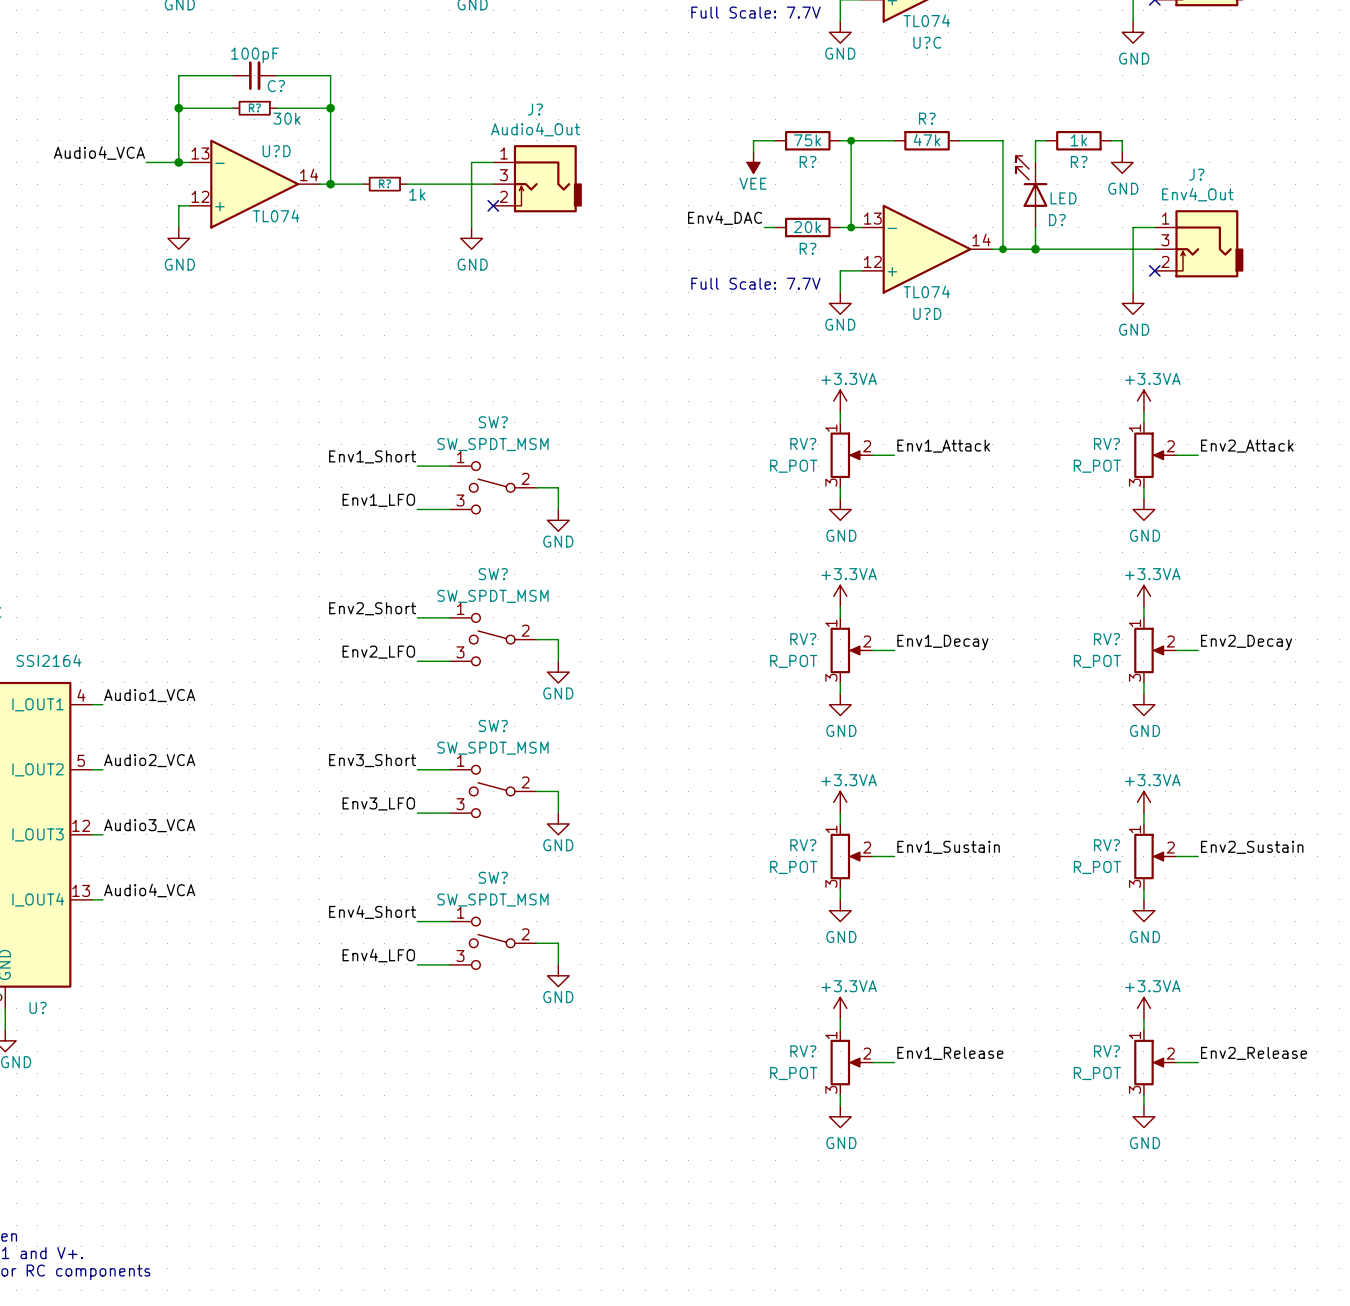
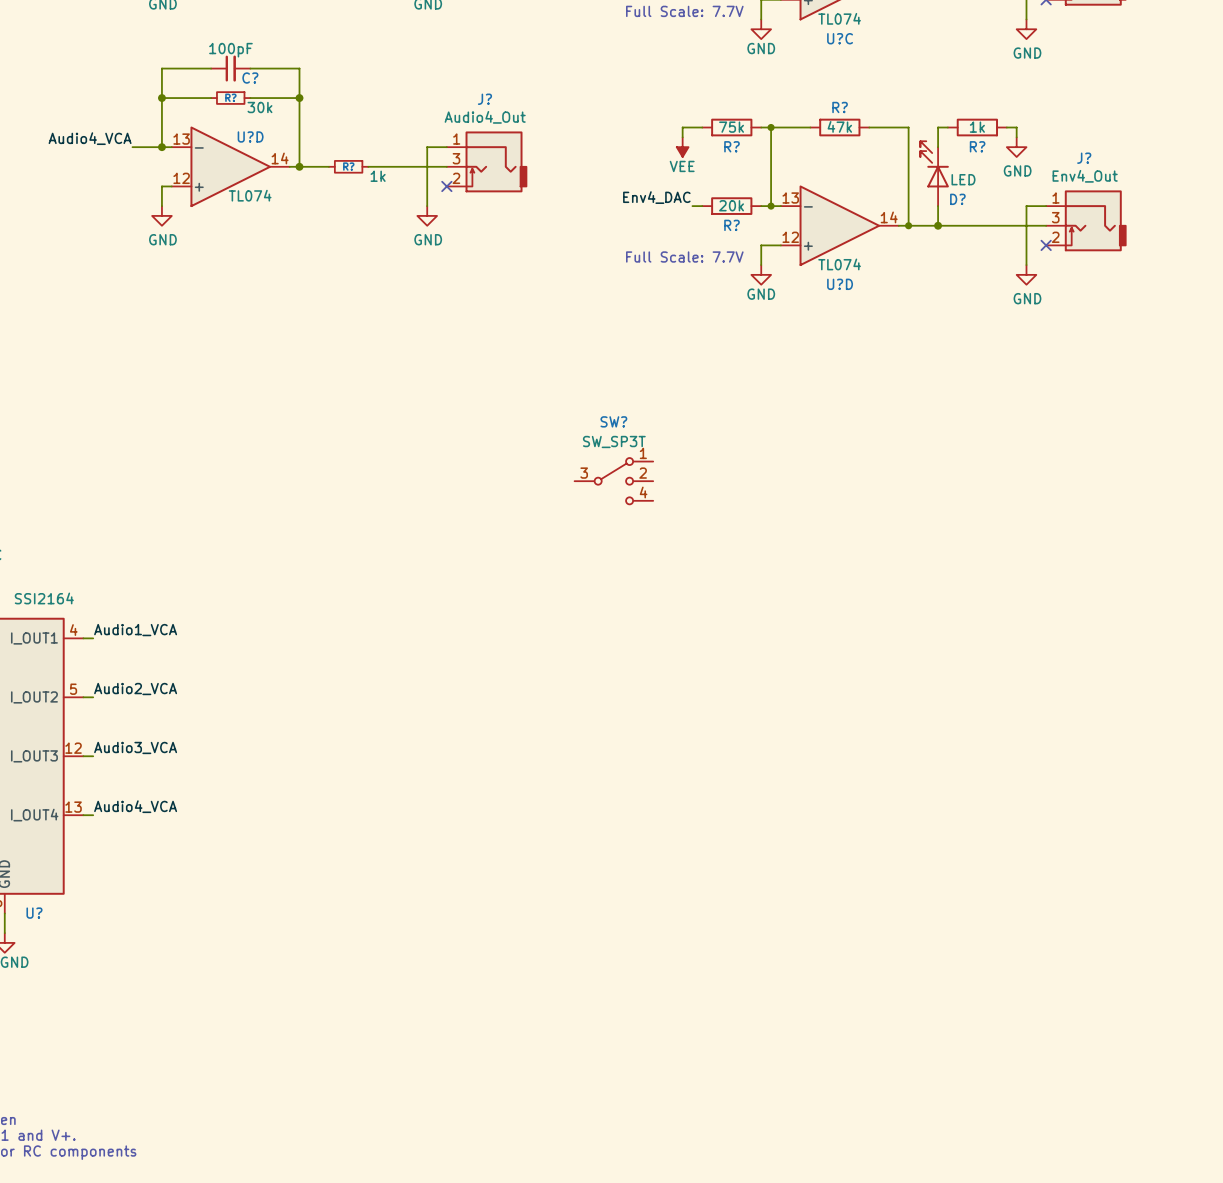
power symbol: +3.3VA (840, 401) -> none
power symbol: +3.3VA (1143, 401) -> none
wire: (840, 411) (840, 422) -> none
wire: (1143, 411) (1143, 422) -> none
label: Env1_Attack (943, 446) -> none
label: Env2_Attack (1247, 446) -> none
RV?: R_POT (851, 455) -> none
wire: (872, 455) (894, 455) -> none
RV?: R_POT (1155, 455) -> none
wire: (1176, 455) (1198, 455) -> none
label: Env1_Short (372, 456) -> none
wire: (417, 466) (449, 466) -> none
SW?: SW_SPDT_MSM (493, 487) -> none
wire: (536, 487) (558, 487) (558, 509) -> none
wire: (840, 487) (840, 498) -> none
wire: (1143, 487) (1143, 498) -> none
label: Env1_LFO (378, 500) -> none
wire: (417, 509) (449, 509) -> none
power symbol: GND (840, 509) -> none
power symbol: GND (1143, 509) -> none
power symbol: GND (558, 520) -> none
SW?: none -> SW_SP3T (613, 481)
power symbol: +3.3VA (840, 596) -> none
power symbol: +3.3VA (1143, 596) -> none
wire: (840, 607) (840, 617) -> none
wire: (1143, 607) (1143, 617) -> none
label: Env2_Short (372, 608) -> none
wire: (417, 617) (449, 617) -> none
SW?: SW_SPDT_MSM (493, 639) -> none
wire: (536, 639) (558, 639) (558, 661) -> none
label: Env1_Decay (942, 642) -> none
label: Env2_Decay (1246, 642) -> none
RV?: R_POT (851, 650) -> none
wire: (872, 650) (894, 650) -> none
RV?: R_POT (1155, 650) -> none
wire: (1176, 650) (1198, 650) -> none
label: Env2_LFO (378, 652) -> none
wire: (417, 661) (449, 661) -> none
power symbol: GND (558, 672) -> none
wire: (840, 682) (840, 693) -> none
wire: (1143, 682) (1143, 693) -> none
power symbol: GND (840, 704) -> none
power symbol: GND (1143, 704) -> none
label: Env3_Short (372, 760) -> none
wire: (417, 769) (449, 769) -> none
SW?: SW_SPDT_MSM (493, 791) -> none
wire: (536, 791) (558, 791) (558, 813) -> none
power symbol: +3.3VA (840, 802) -> none
power symbol: +3.3VA (1143, 802) -> none
label: Env3_LFO (378, 803) -> none
wire: (417, 813) (449, 813) -> none
wire: (840, 813) (840, 823) -> none
wire: (1143, 813) (1143, 823) -> none
power symbol: GND (558, 823) -> none
label: Env1_Sustain (948, 847) -> none
label: Env2_Sustain (1252, 847) -> none
RV?: R_POT (851, 856) -> none
wire: (872, 856) (894, 856) -> none
RV?: R_POT (1155, 856) -> none
wire: (1176, 856) (1198, 856) -> none
wire: (840, 889) (840, 899) -> none
wire: (1143, 889) (1143, 899) -> none
power symbol: GND (840, 910) -> none
power symbol: GND (1143, 910) -> none
label: Env4_Short (372, 912) -> none
wire: (417, 921) (449, 921) -> none
SW?: SW_SPDT_MSM (493, 943) -> none
wire: (536, 943) (558, 943) (558, 964) -> none
label: Env4_LFO (378, 955) -> none
wire: (417, 964) (449, 964) -> none
power symbol: GND (558, 975) -> none
power symbol: +3.3VA (840, 1008) -> none
power symbol: +3.3VA (1143, 1008) -> none
wire: (840, 1019) (840, 1030) -> none
wire: (1143, 1019) (1143, 1030) -> none
label: Env1_Release (950, 1053) -> none
label: Env2_Release (1254, 1053) -> none
RV?: R_POT (851, 1062) -> none
wire: (872, 1062) (894, 1062) -> none
RV?: R_POT (1155, 1062) -> none
wire: (1176, 1062) (1198, 1062) -> none
wire: (840, 1095) (840, 1105) -> none
wire: (1143, 1095) (1143, 1105) -> none
power symbol: GND (840, 1116) -> none
power symbol: GND (1143, 1116) -> none

